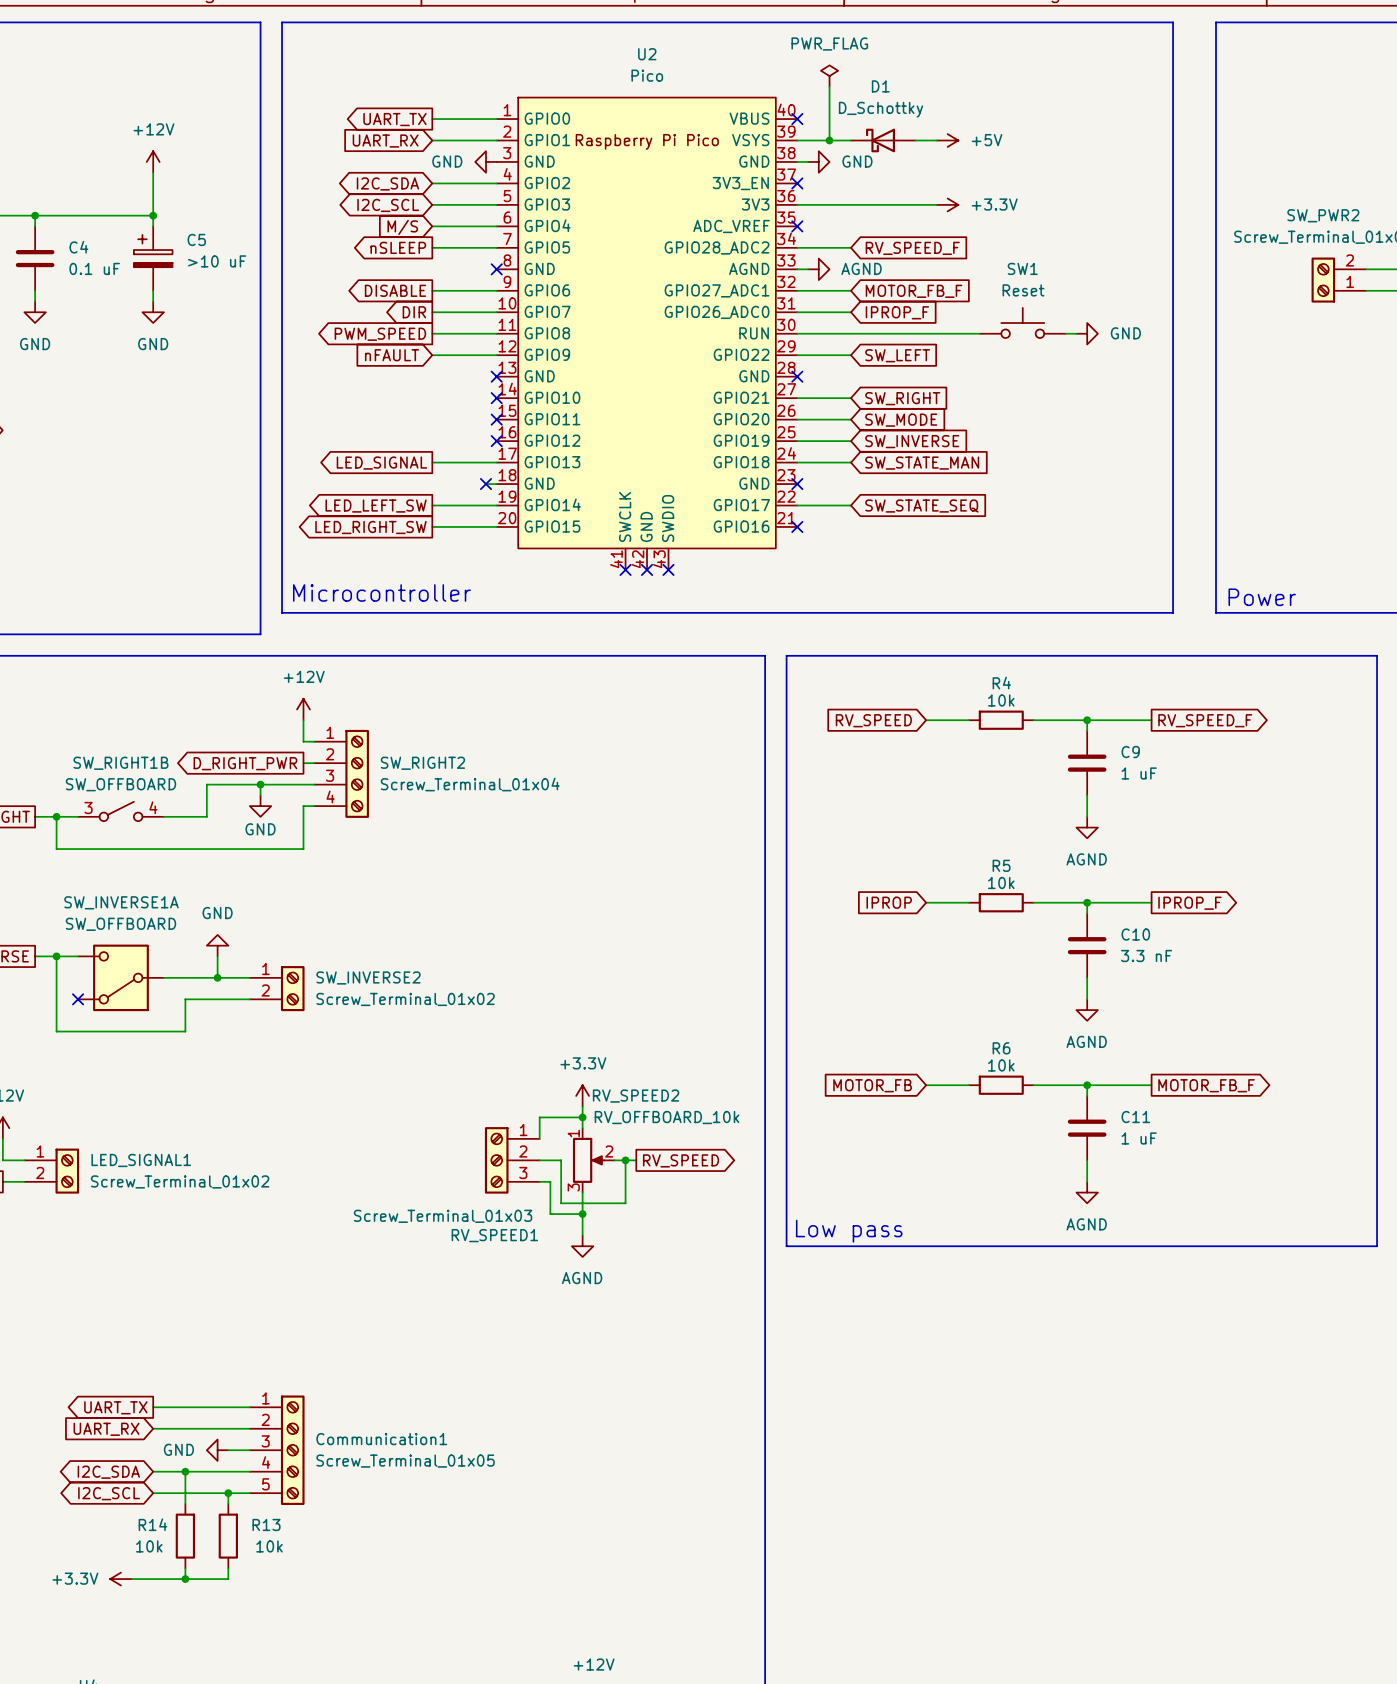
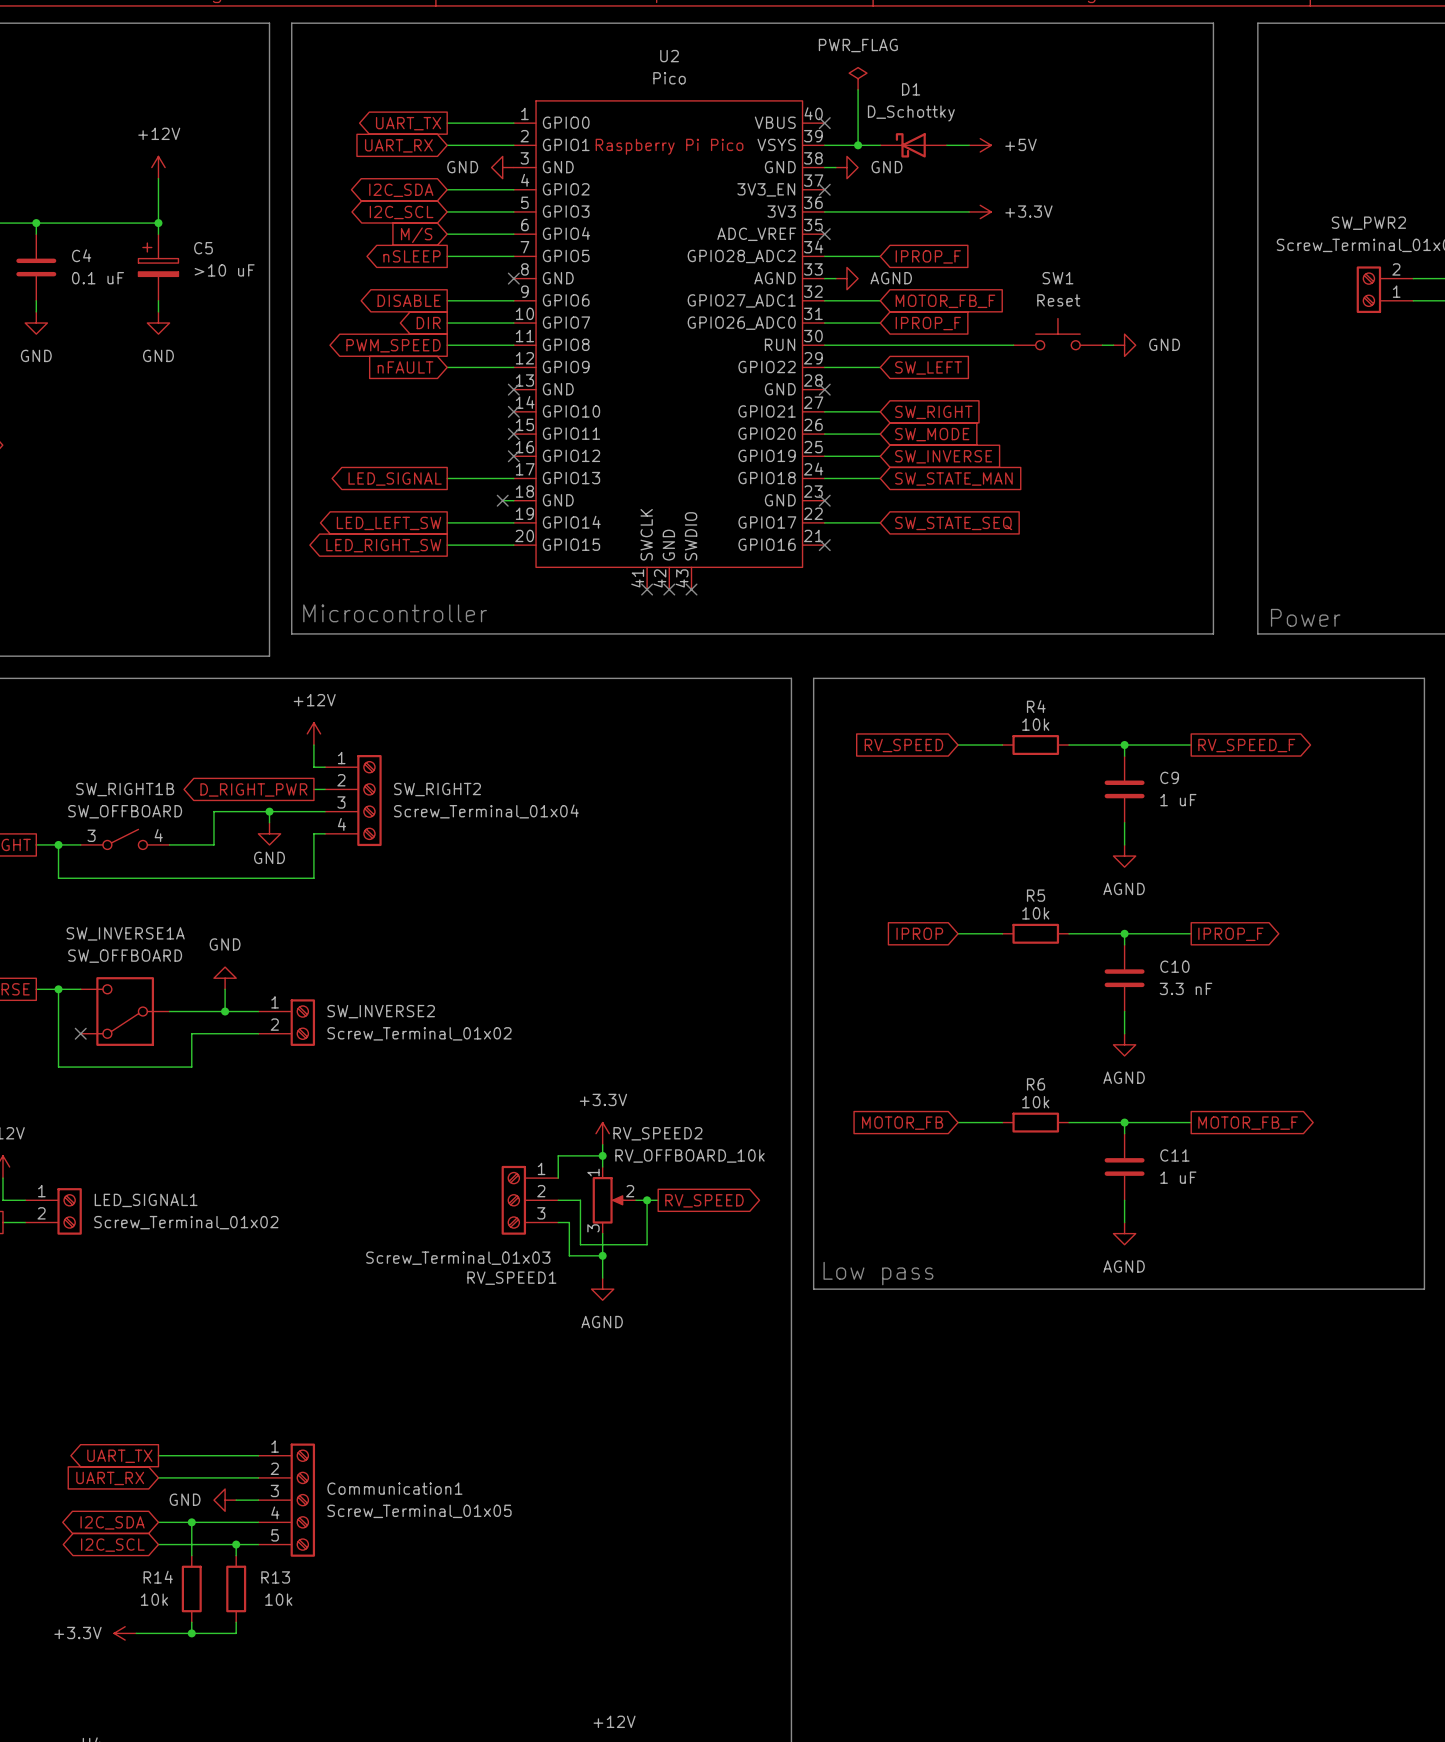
global label: RV_SPEED_F (912, 248) -> IPROP_F (928, 256)

